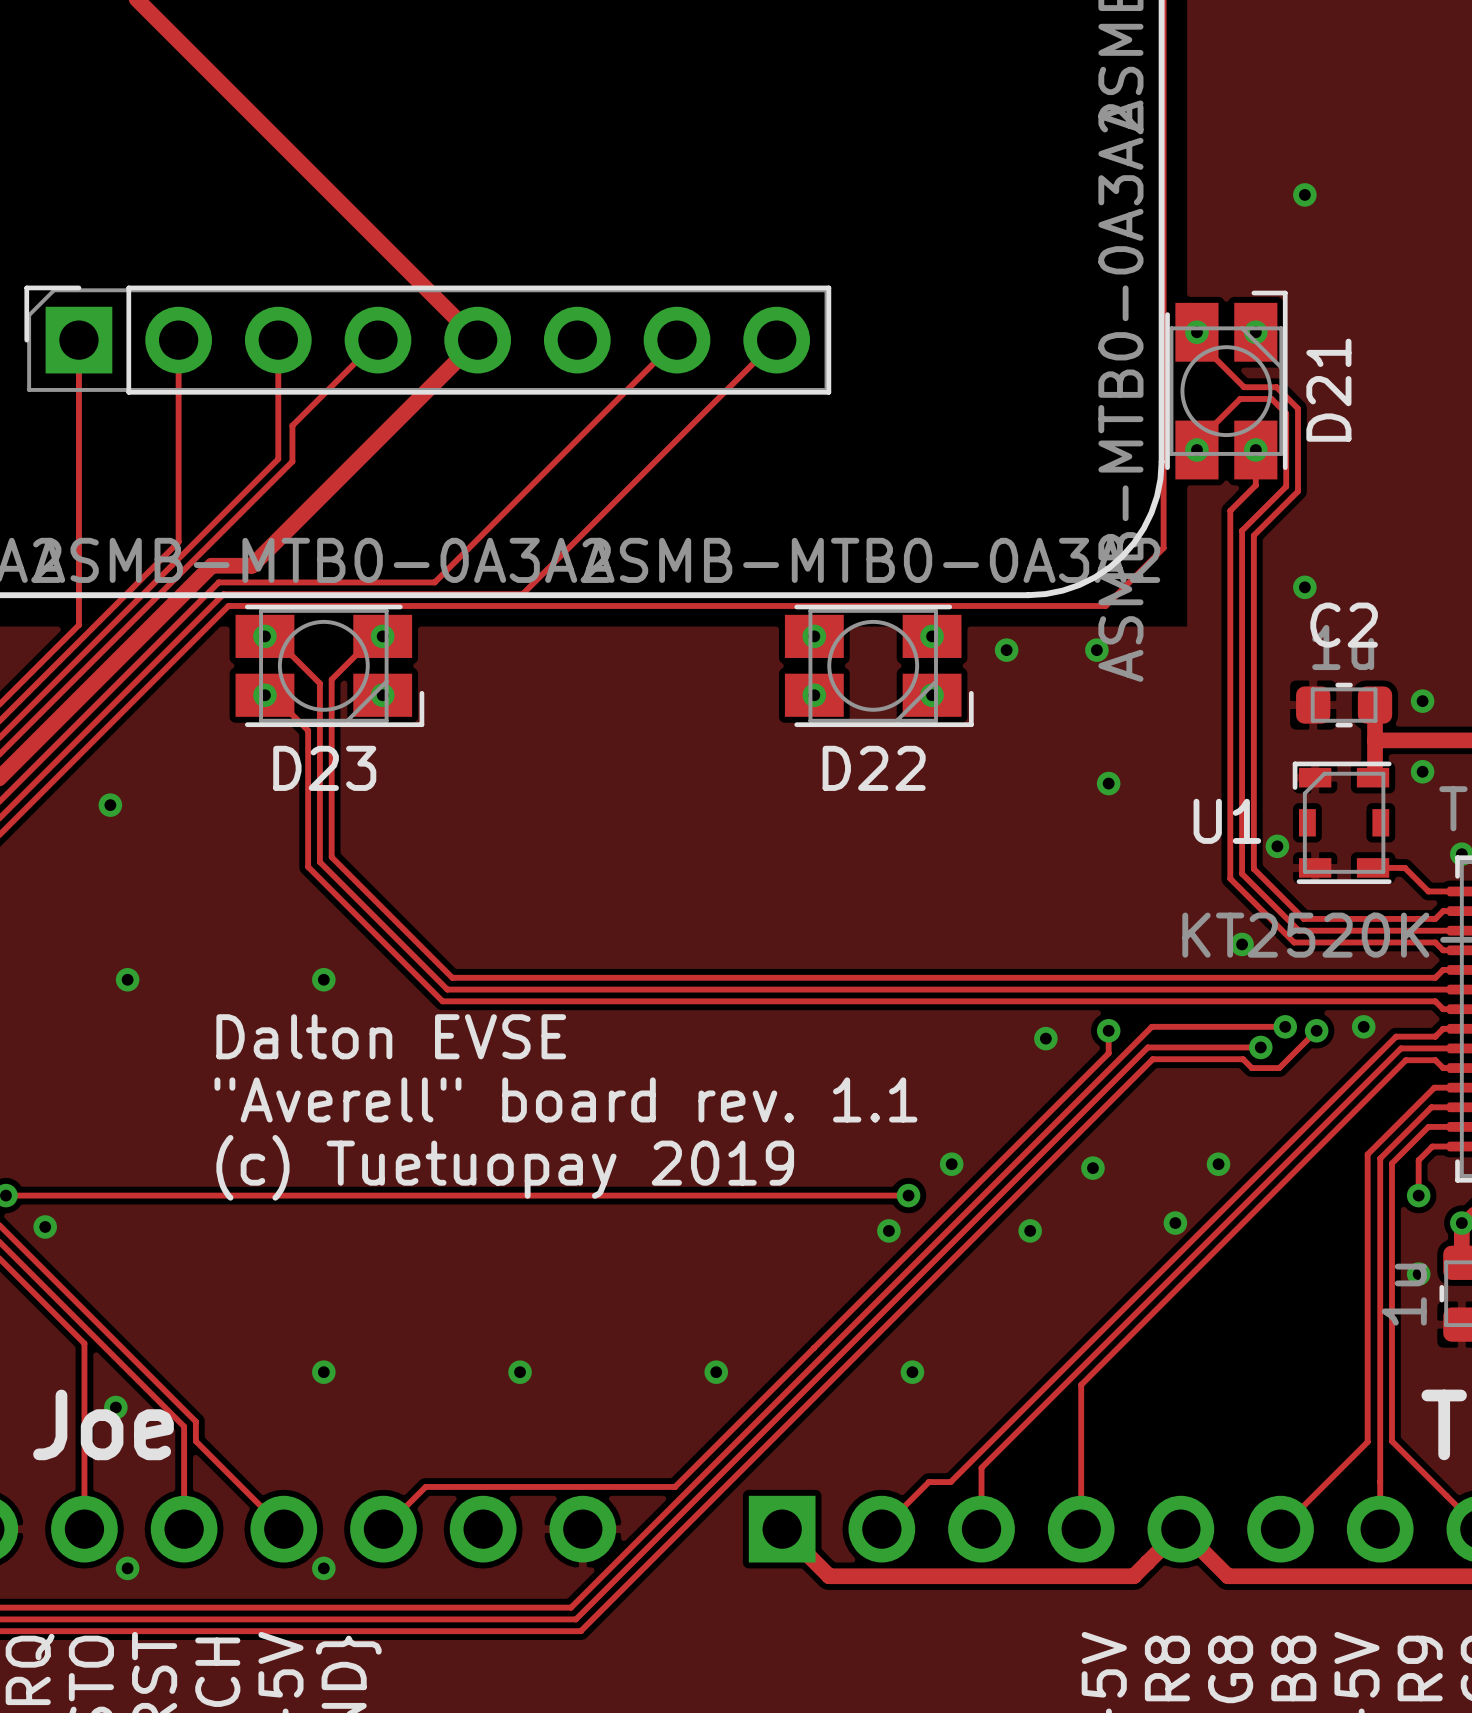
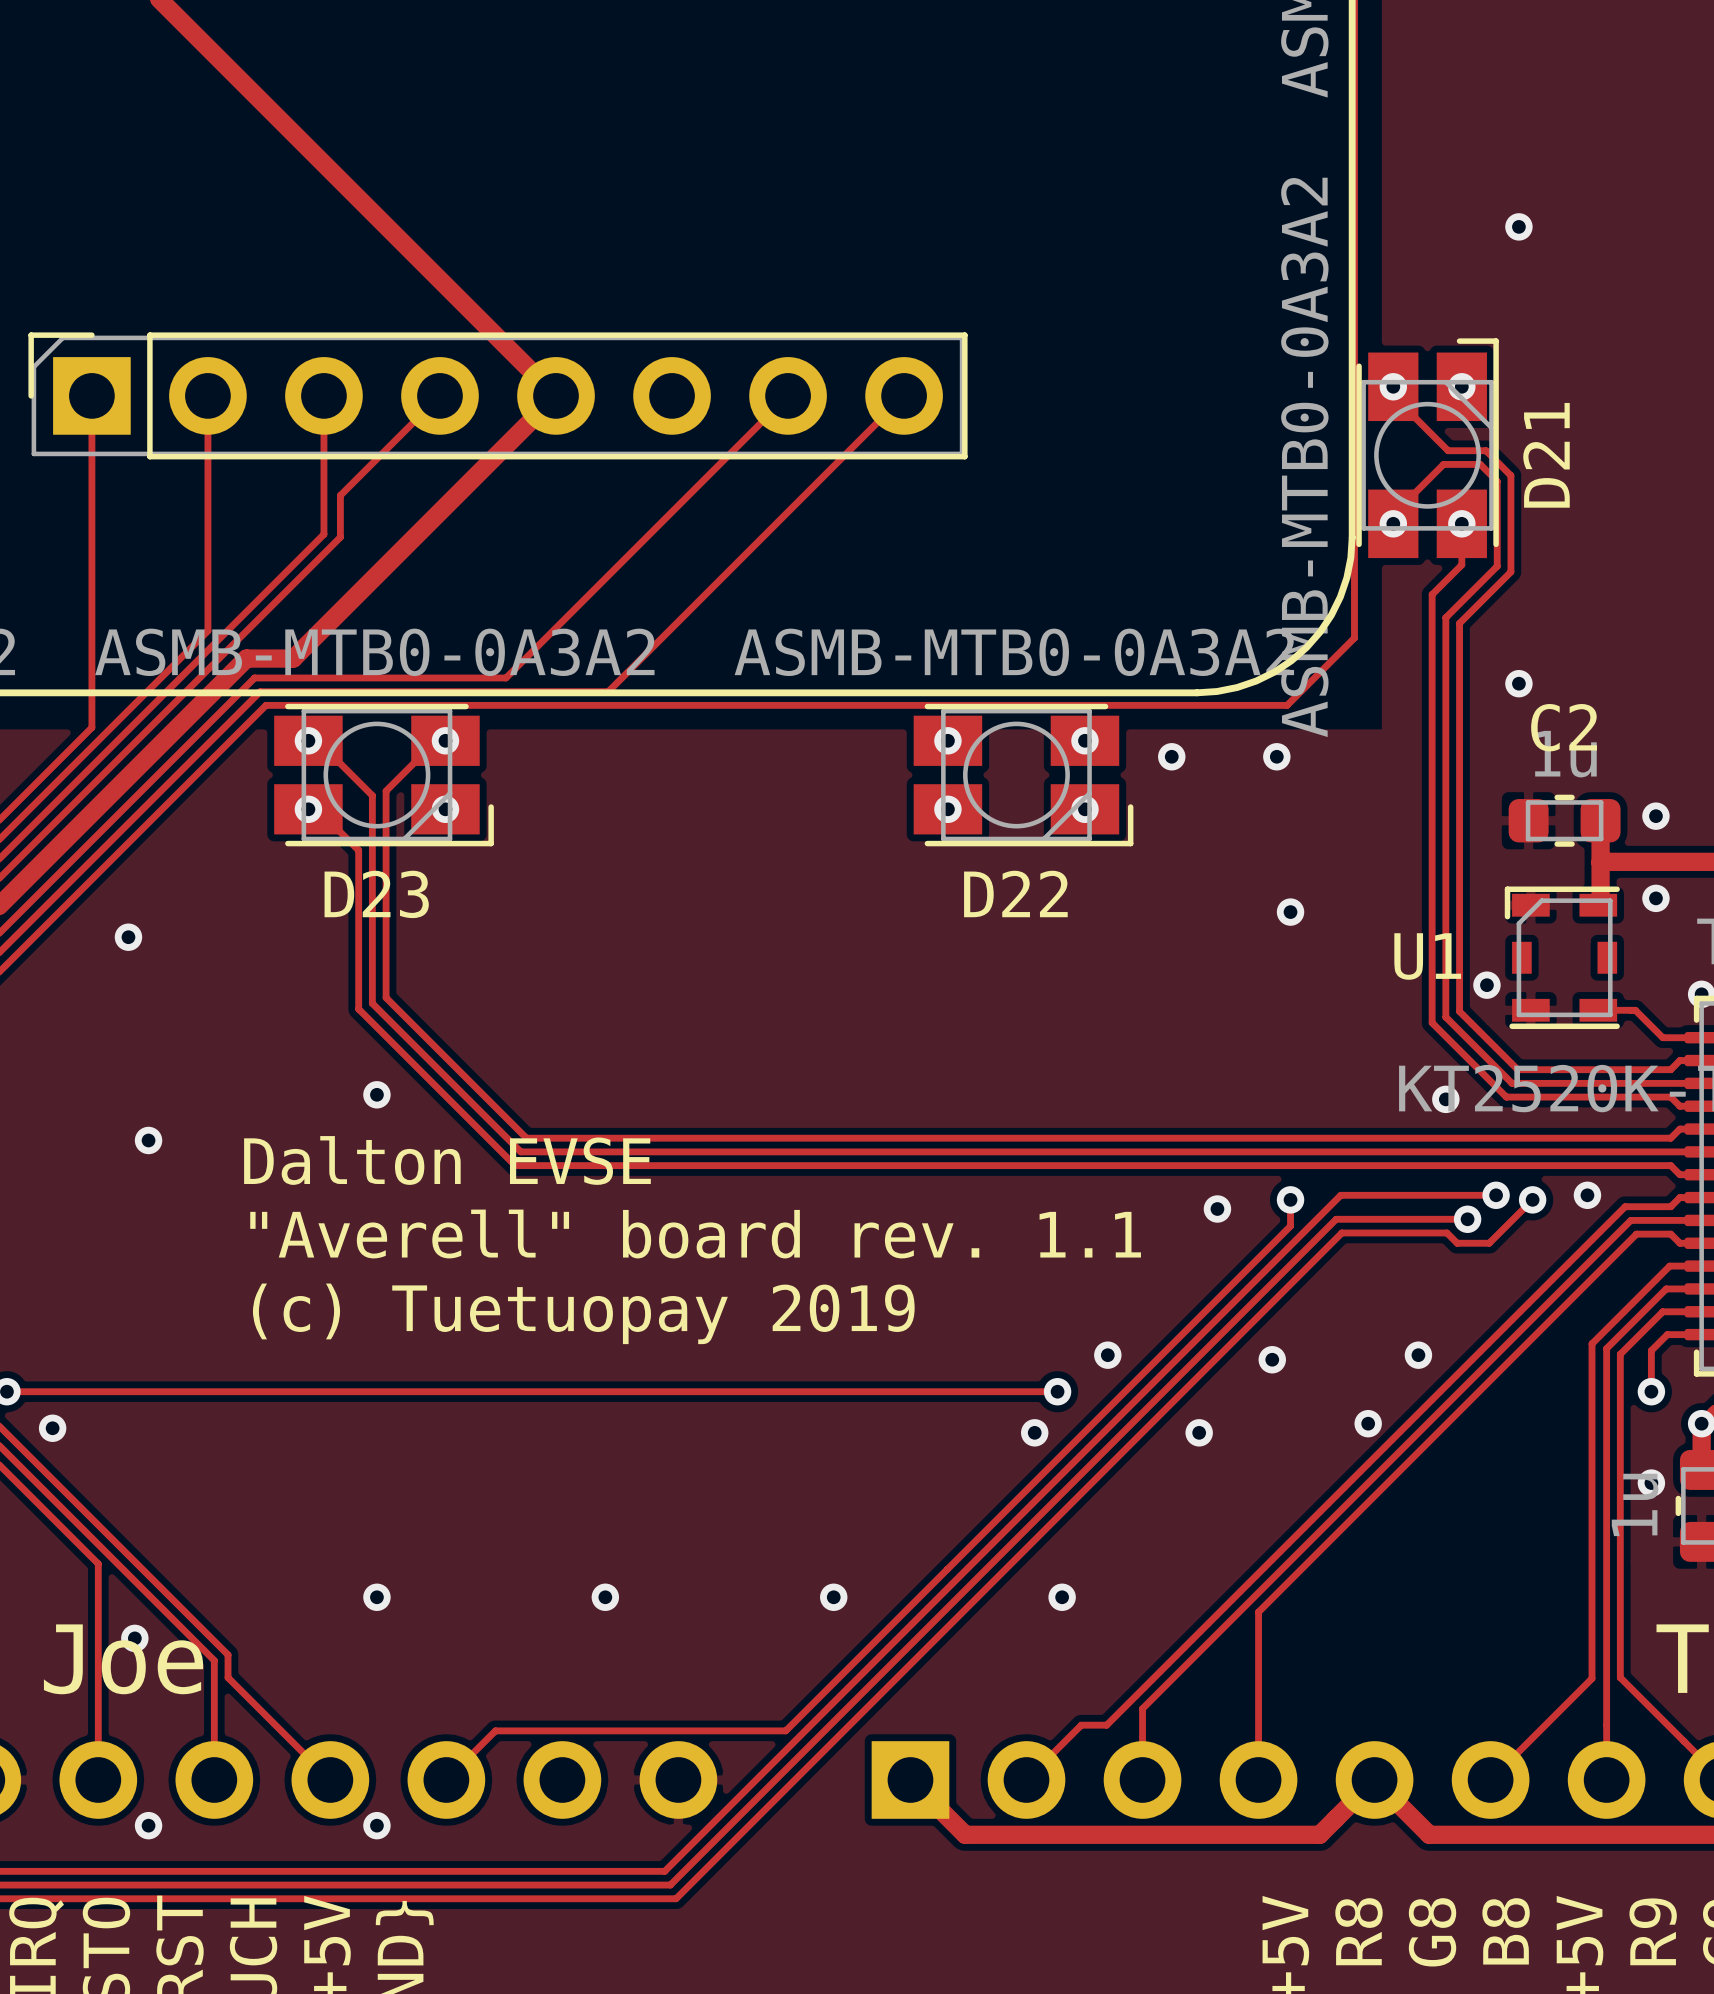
via position: (323, 979) -> (376, 1094)
text position: Dalton EVSE (391, 1036) -> Dalton EVSE (447, 1160)
text position: "Averell" board rev. 1.1 (565, 1099) -> "Averell" board rev. 1.1 (695, 1234)
text position: (c) Tuetuopay 2019 (505, 1167) -> (c) Tuetuopay 2019 (583, 1313)

